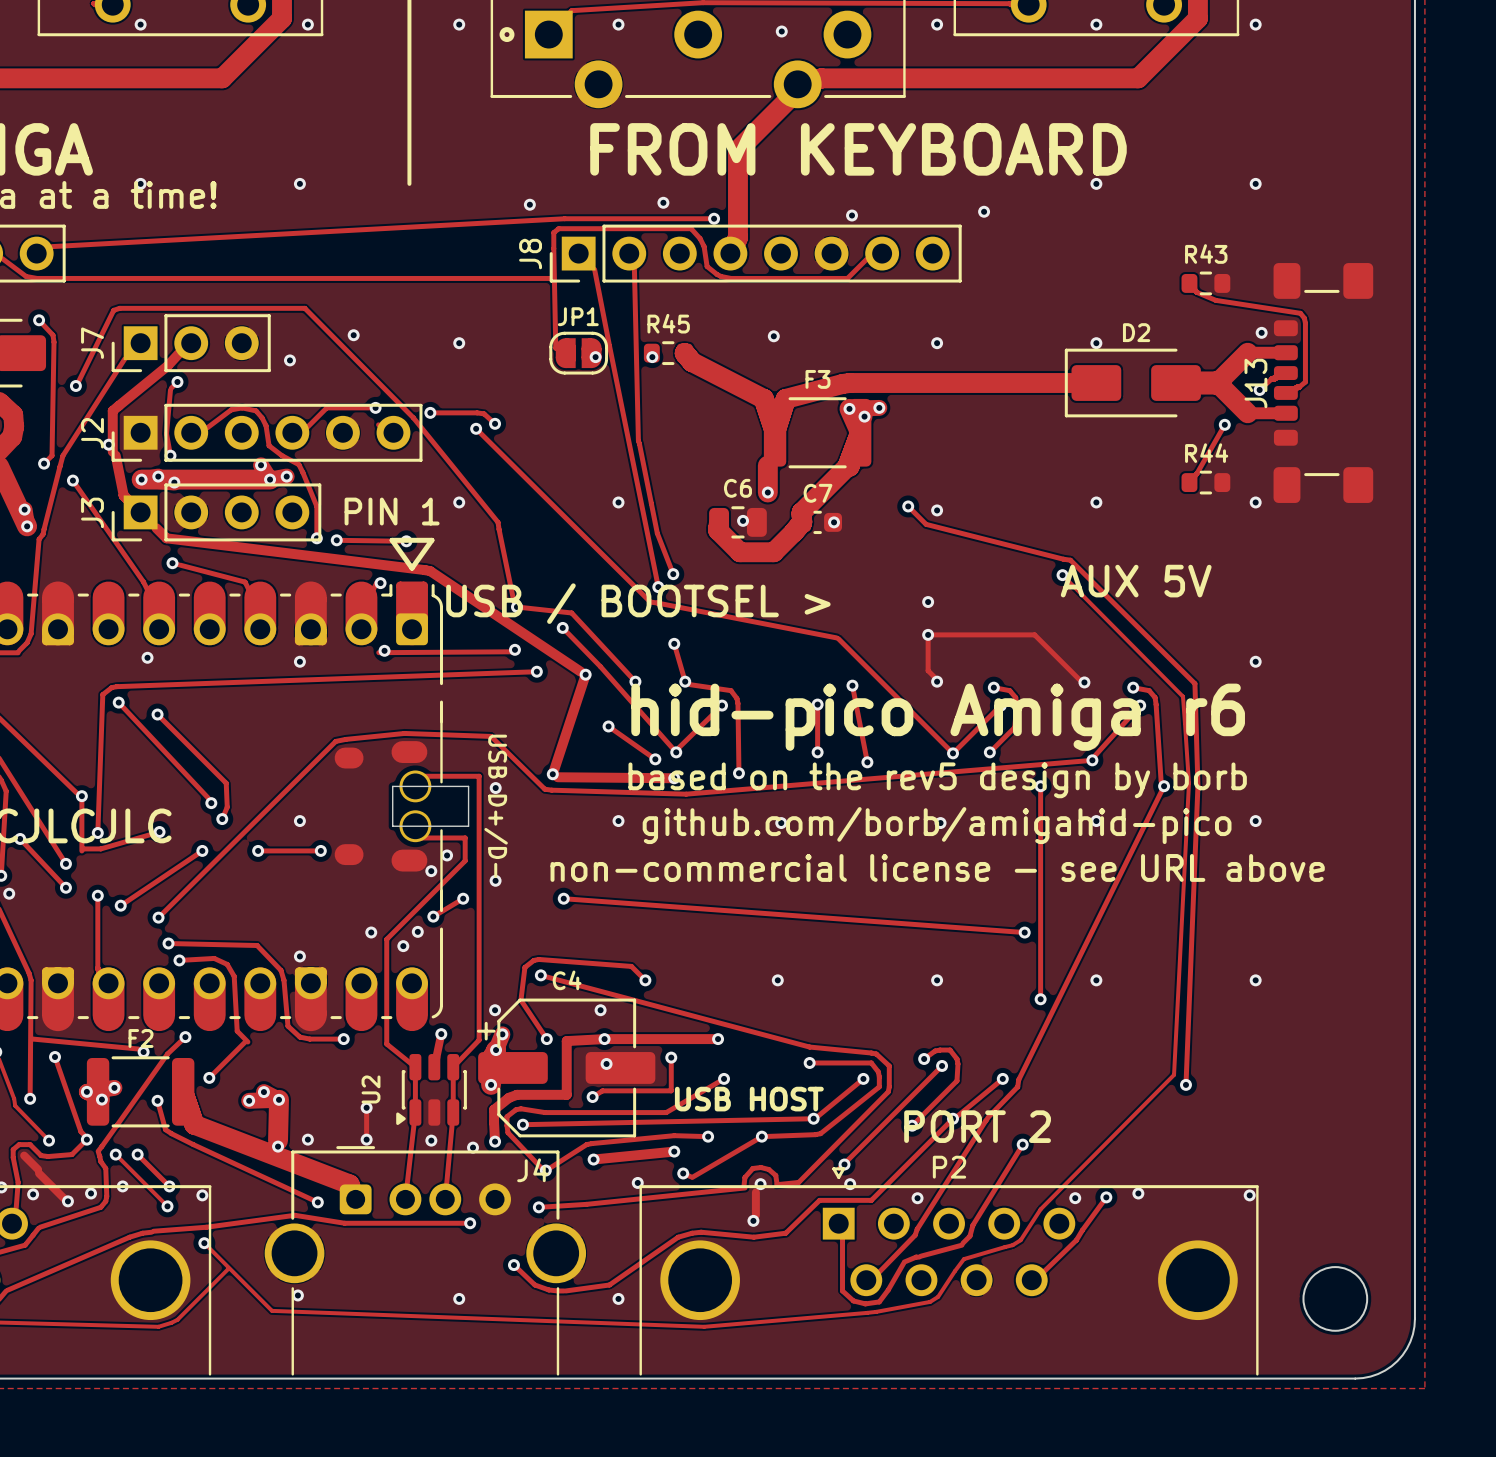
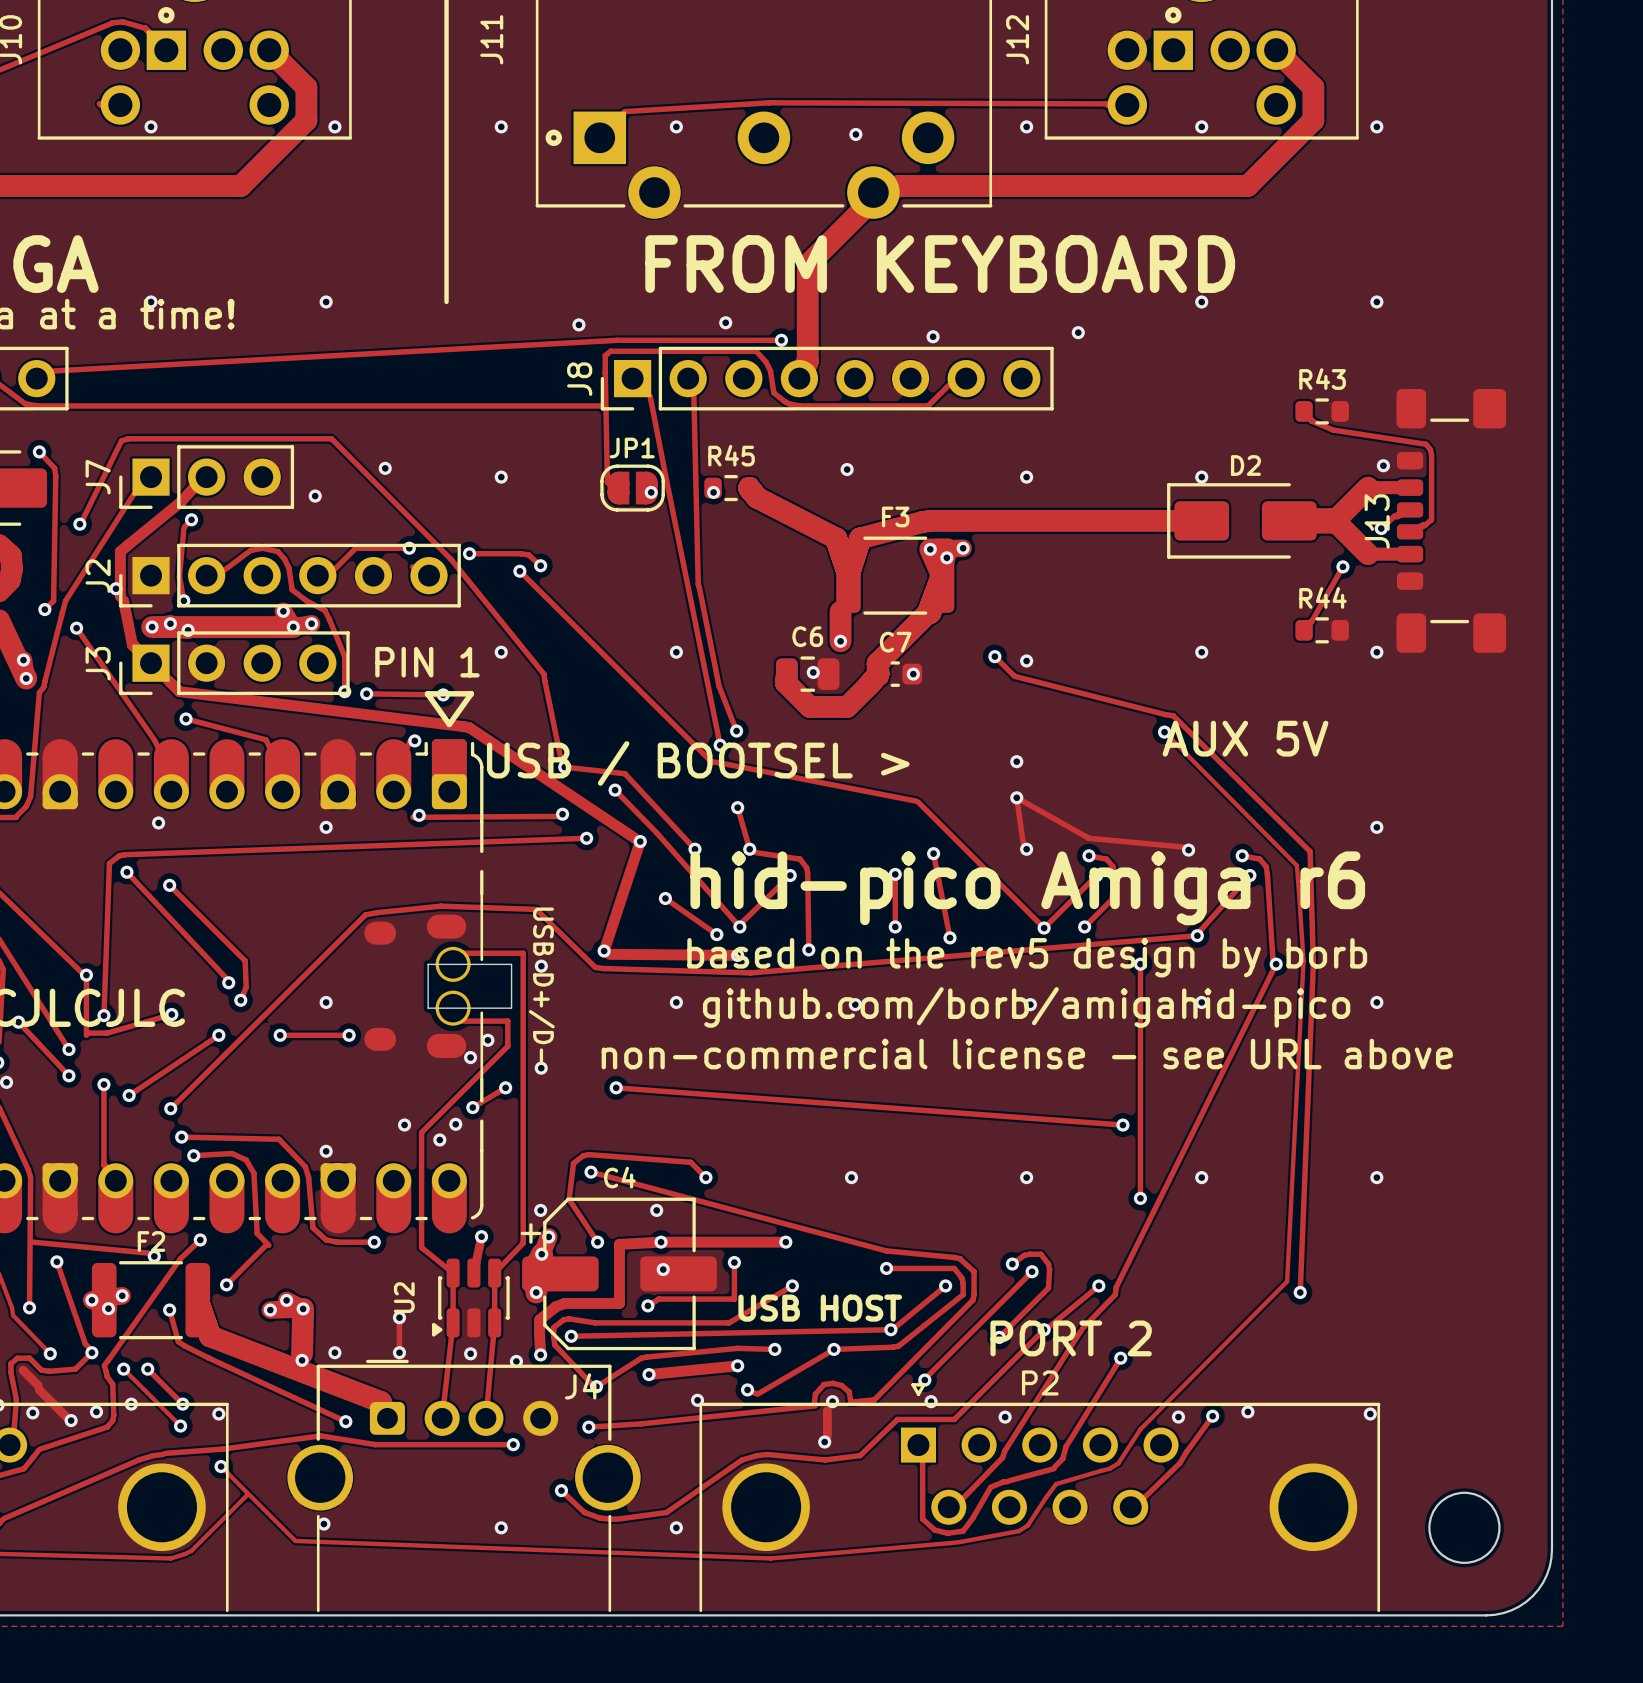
track: (934, 676) (928, 670) (928, 634) (1034, 634) (1079, 679) -> (1023, 843) (1016, 797) (1089, 838) (1183, 847)

